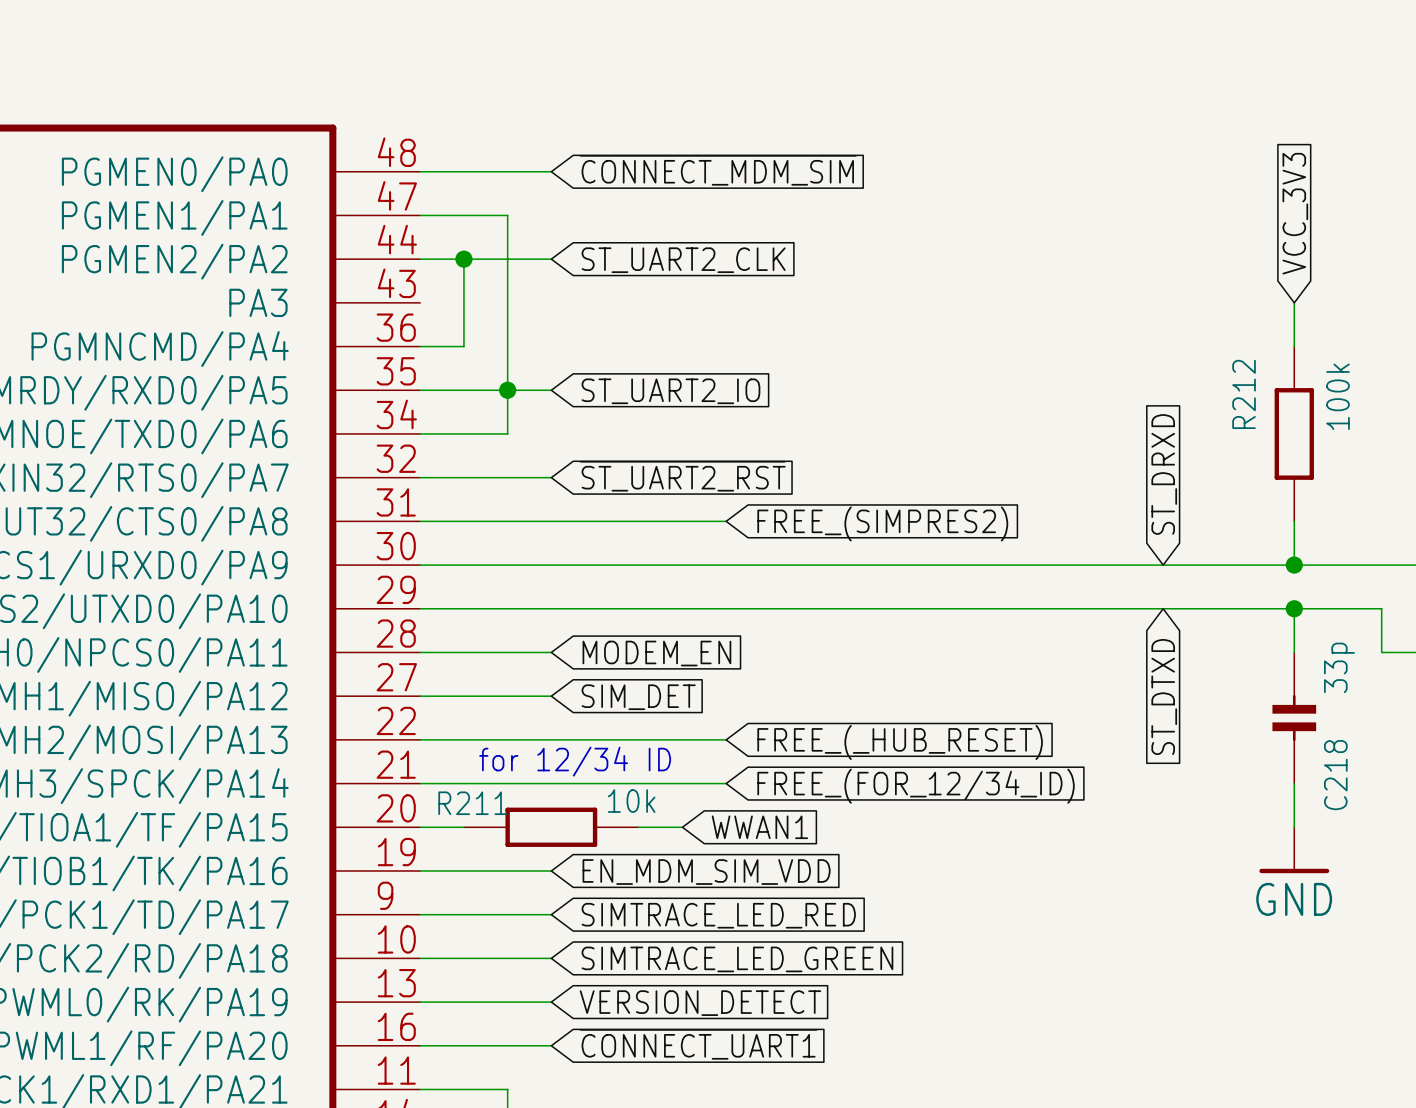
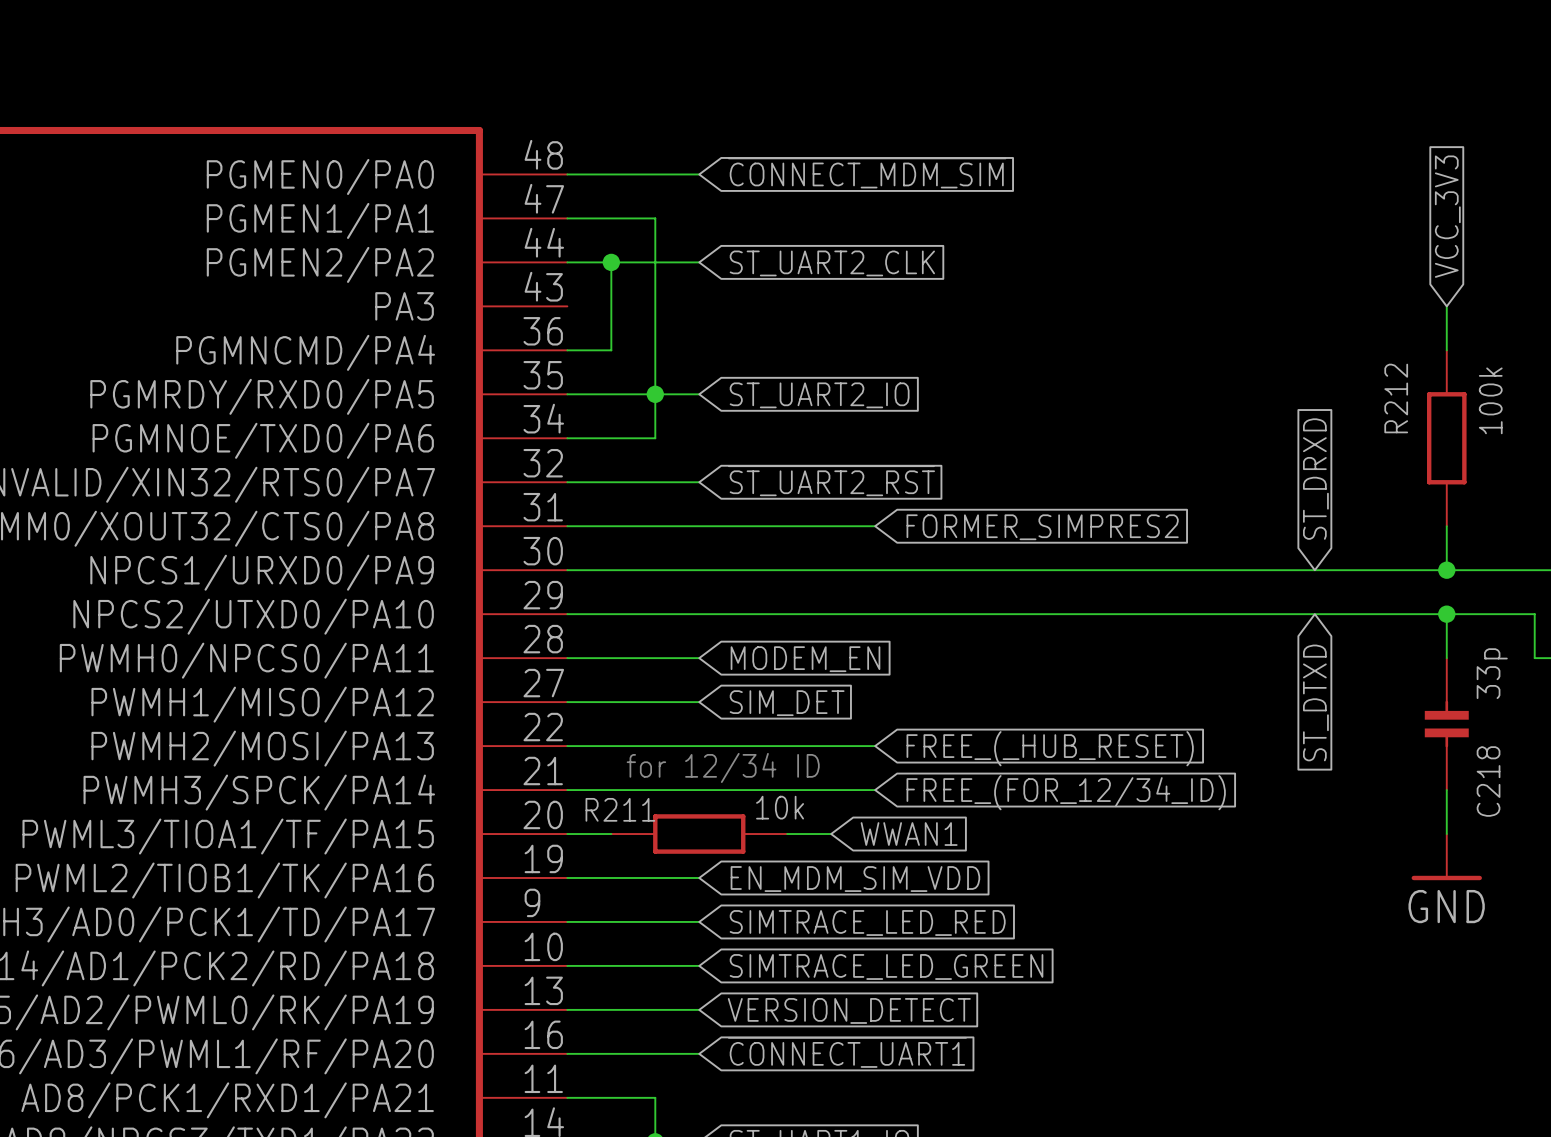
global label: FREE_(SIMPRES2) (882, 523) -> FORMER_SIMPRES2 (1042, 527)

